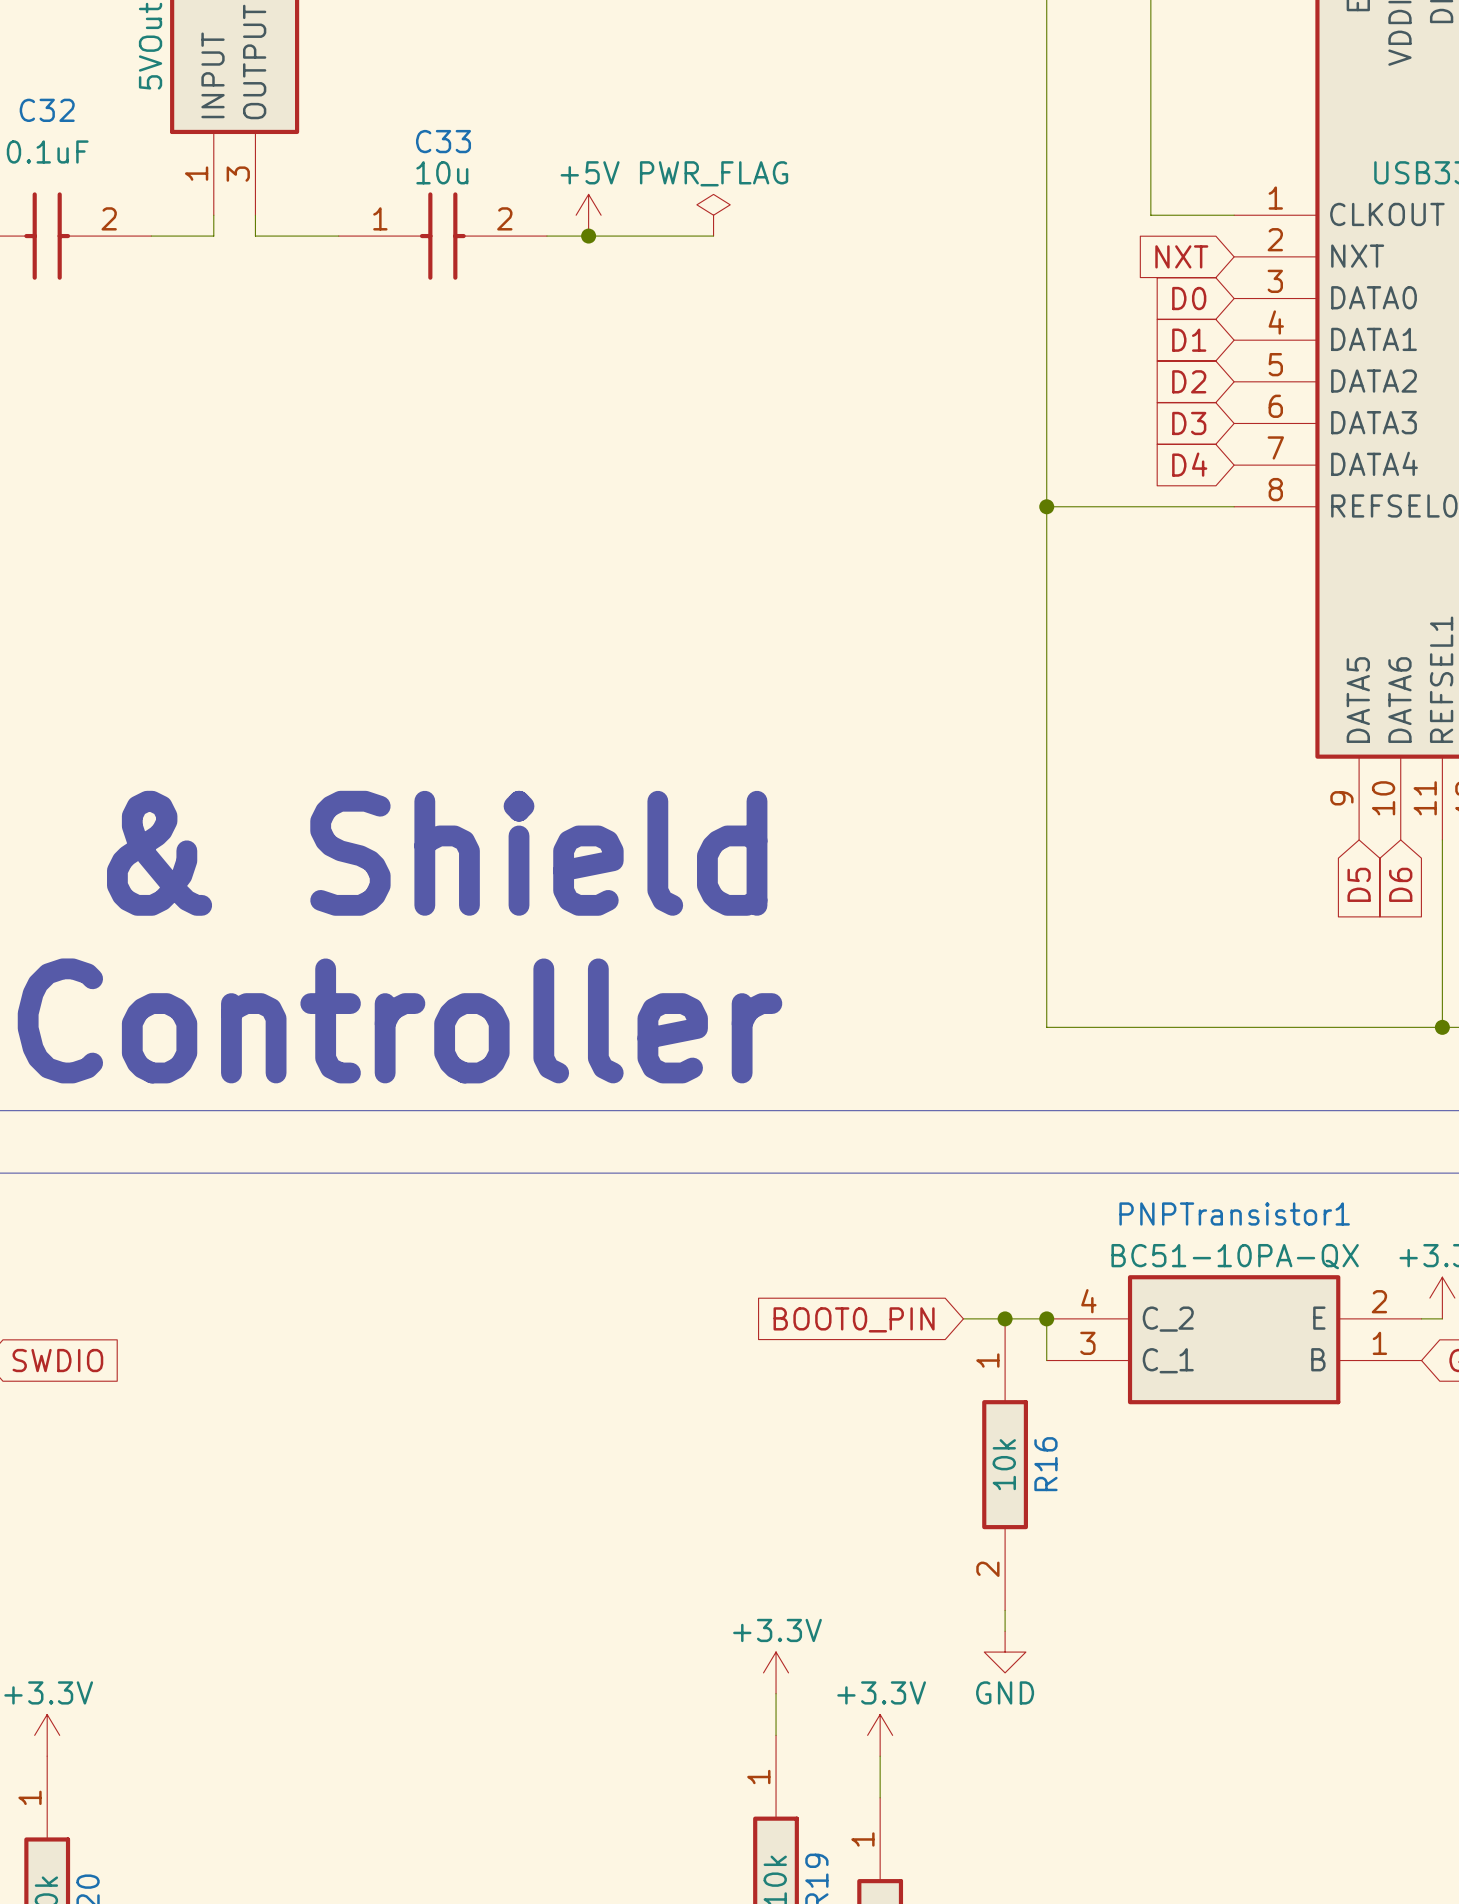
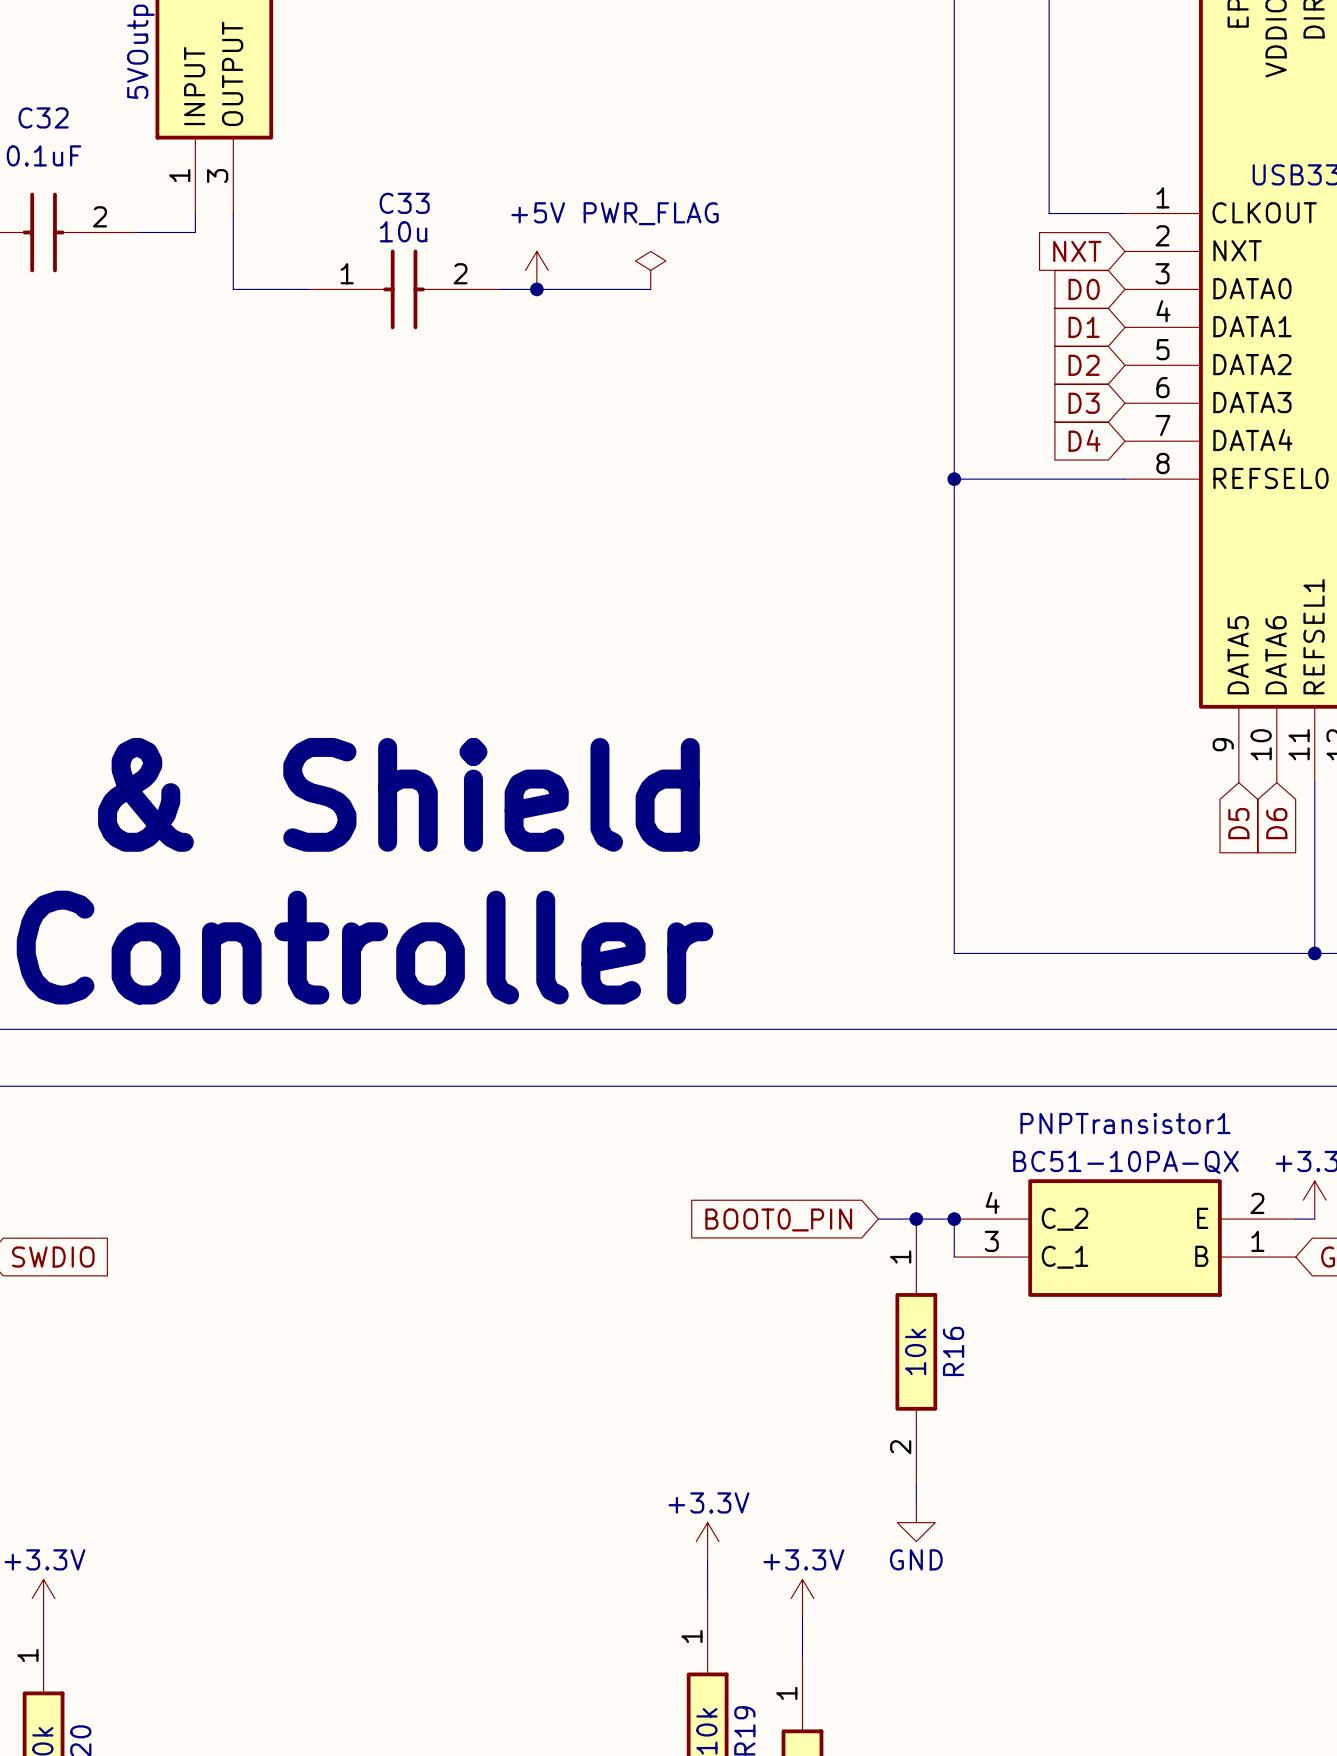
power symbol text position: +5V (590, 172) -> +5V (538, 212)
power symbol text position: PWR_FLAG (714, 173) -> PWR_FLAG (651, 213)
power symbol position: +5V (588, 215) -> +5V (536, 270)
power symbol position: PWR_FLAG (713, 215) -> PWR_FLAG (650, 270)
wire: (255, 236) (338, 236) -> (233, 232) (233, 289) (309, 289)
C33 position: (442, 236) -> (404, 289)
wire: (546, 236) (713, 236) -> (498, 289) (650, 289)
junction position: (588, 236) -> (536, 289)

